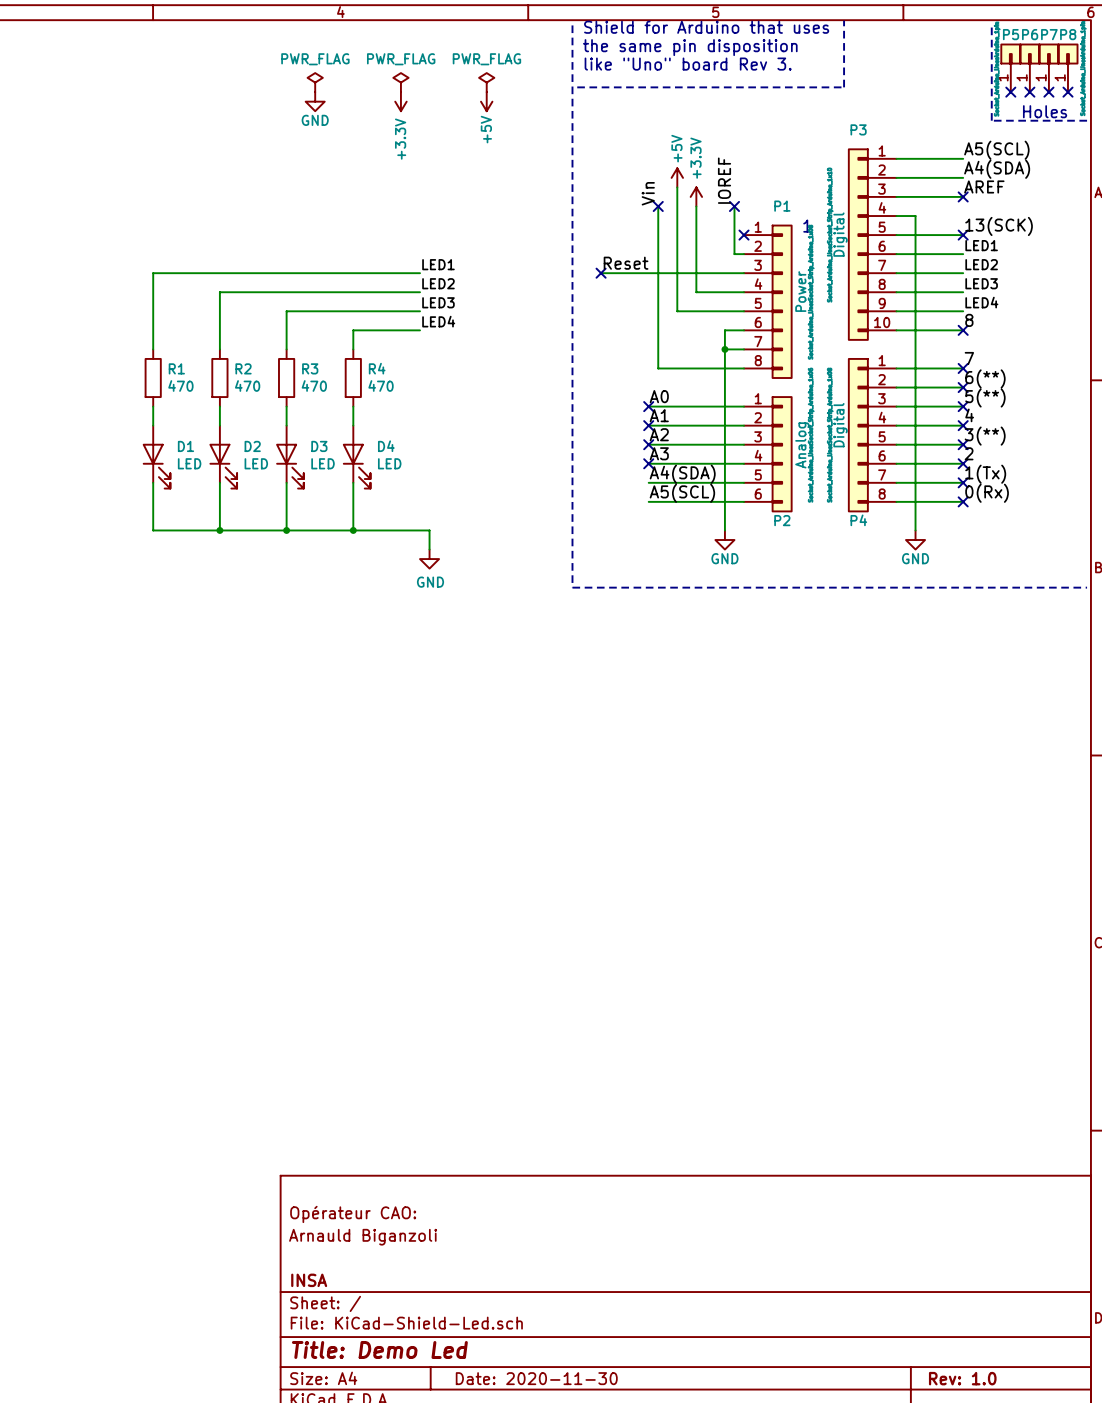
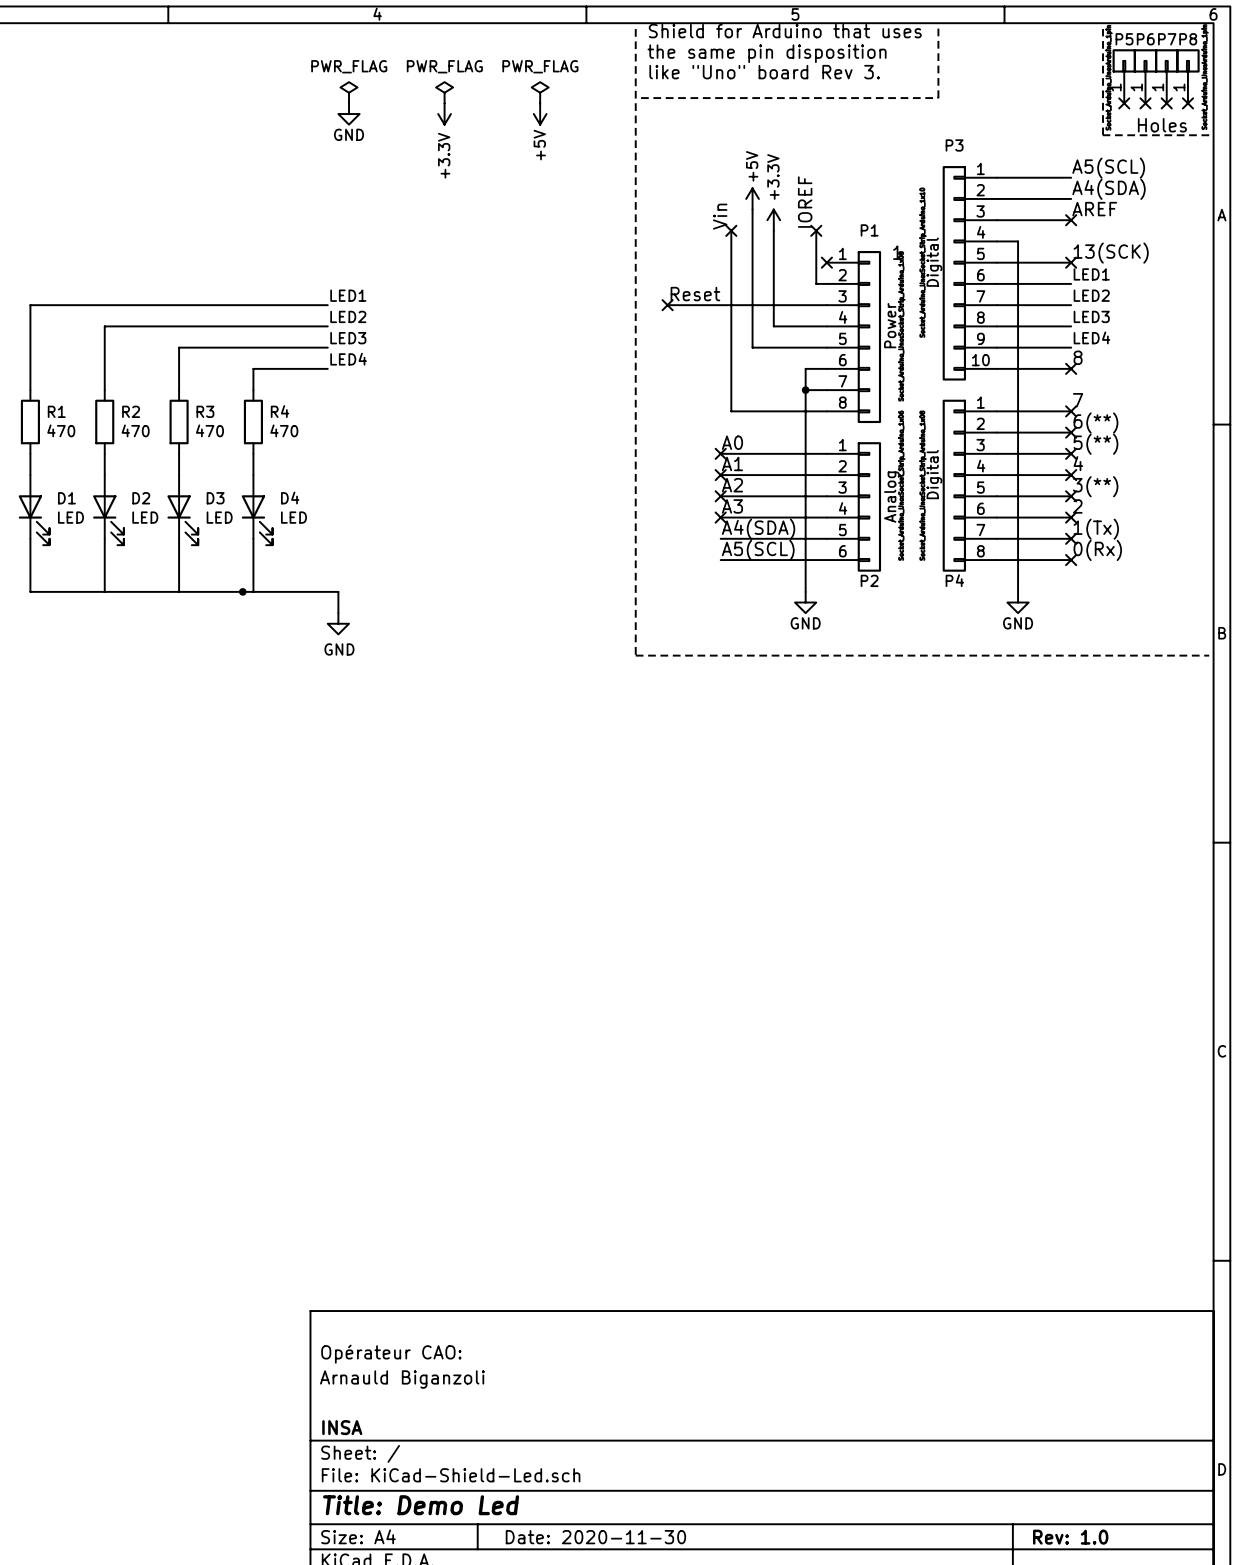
label position: LED1 (438, 264) -> LED1 (348, 295)
wire: (153, 273) (153, 349) -> (168, 305) (30, 305) (30, 390)
wire: (296, 273) (420, 273) -> none
label position: LED2 (438, 283) -> LED2 (348, 316)
wire: (219, 292) (219, 349) -> (242, 326) (104, 326) (104, 390)
wire: (296, 292) (420, 292) -> none
label position: LED3 (438, 302) -> LED3 (348, 338)
wire: (286, 311) (286, 349) -> (317, 347) (179, 347) (179, 390)
wire: (296, 311) (420, 311) -> none
label position: LED4 (438, 321) -> LED4 (348, 359)
wire: (420, 330) (353, 330) (353, 349) -> (327, 368) (253, 368) (253, 390)
R1 position: (153, 378) -> (30, 421)
R2 position: (219, 378) -> (104, 421)
R3 position: (286, 378) -> (179, 421)
R4 position: (353, 378) -> (253, 421)
wire: (153, 406) (153, 425) -> (30, 453) (30, 475)
wire: (219, 406) (219, 425) -> (104, 453) (104, 475)
wire: (286, 406) (286, 425) -> (179, 453) (179, 475)
wire: (353, 406) (353, 425) -> (253, 453) (253, 475)
D1 position: (156, 457) -> (34, 510)
D2 position: (223, 457) -> (108, 510)
D3 position: (289, 457) -> (182, 510)
D4 position: (356, 457) -> (257, 510)
wire: (153, 482) (153, 530) -> (30, 538) (30, 591) (168, 591)
wire: (219, 482) (219, 530) -> (104, 538) (104, 591)
wire: (286, 482) (286, 530) -> (179, 538) (179, 591)
wire: (353, 482) (353, 530) -> (253, 538) (253, 591)
junction: (286, 530) -> none
wire: (305, 530) (429, 530) (429, 549) -> (338, 591) (338, 613)
junction: (353, 530) -> none
power symbol position: GND (429, 559) -> GND (338, 623)

